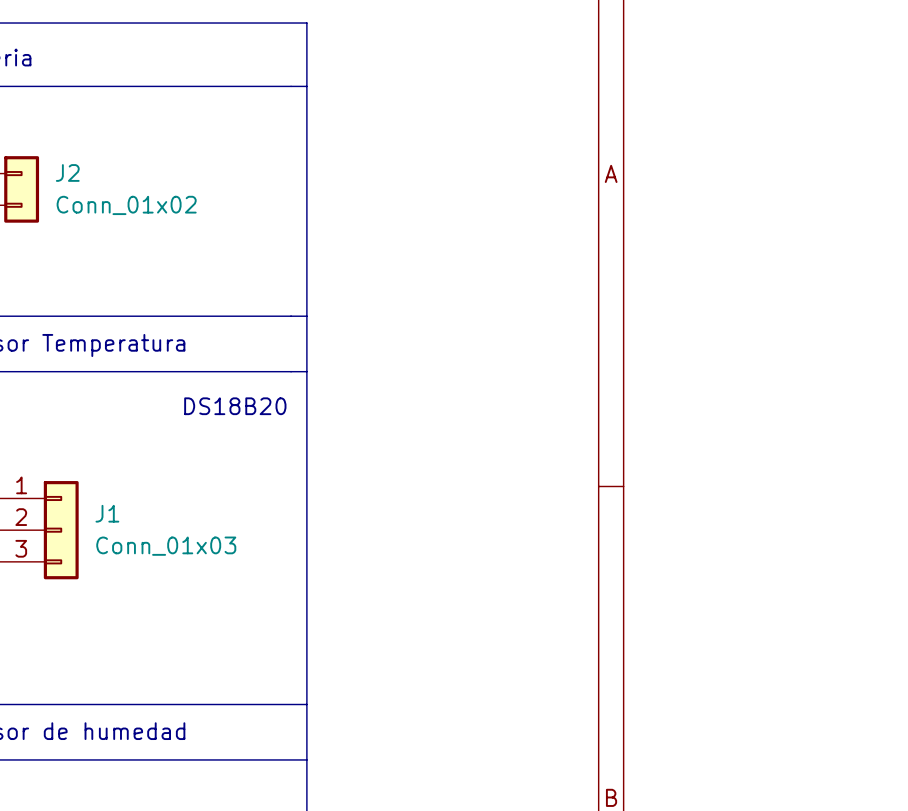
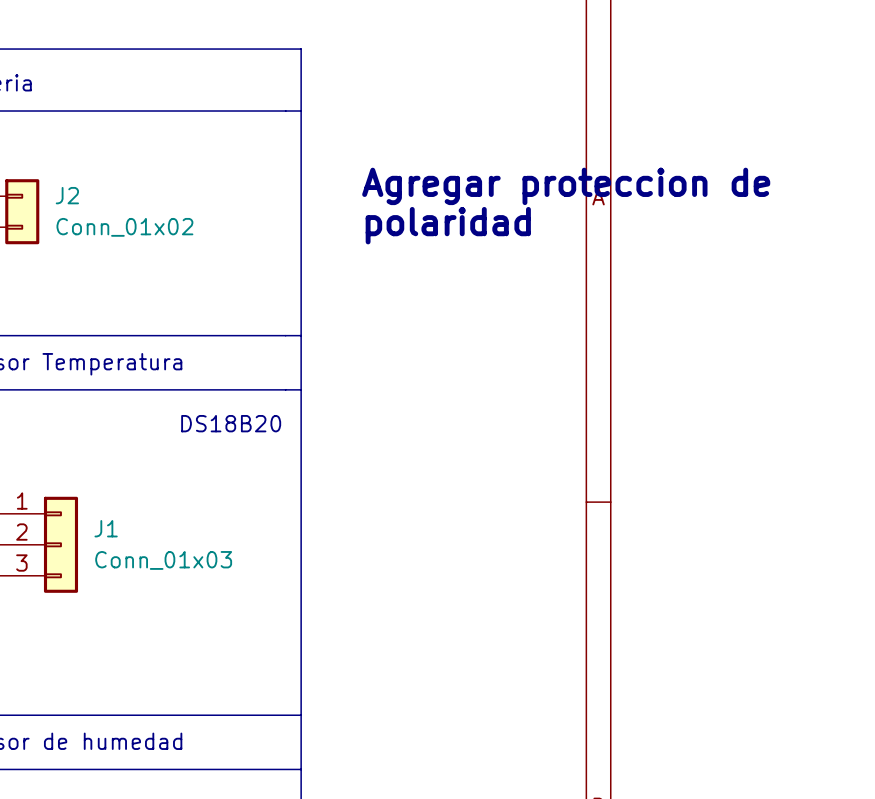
text: none -> Agregar proteccion de (566, 186)
text: none -> polaridad (448, 225)

